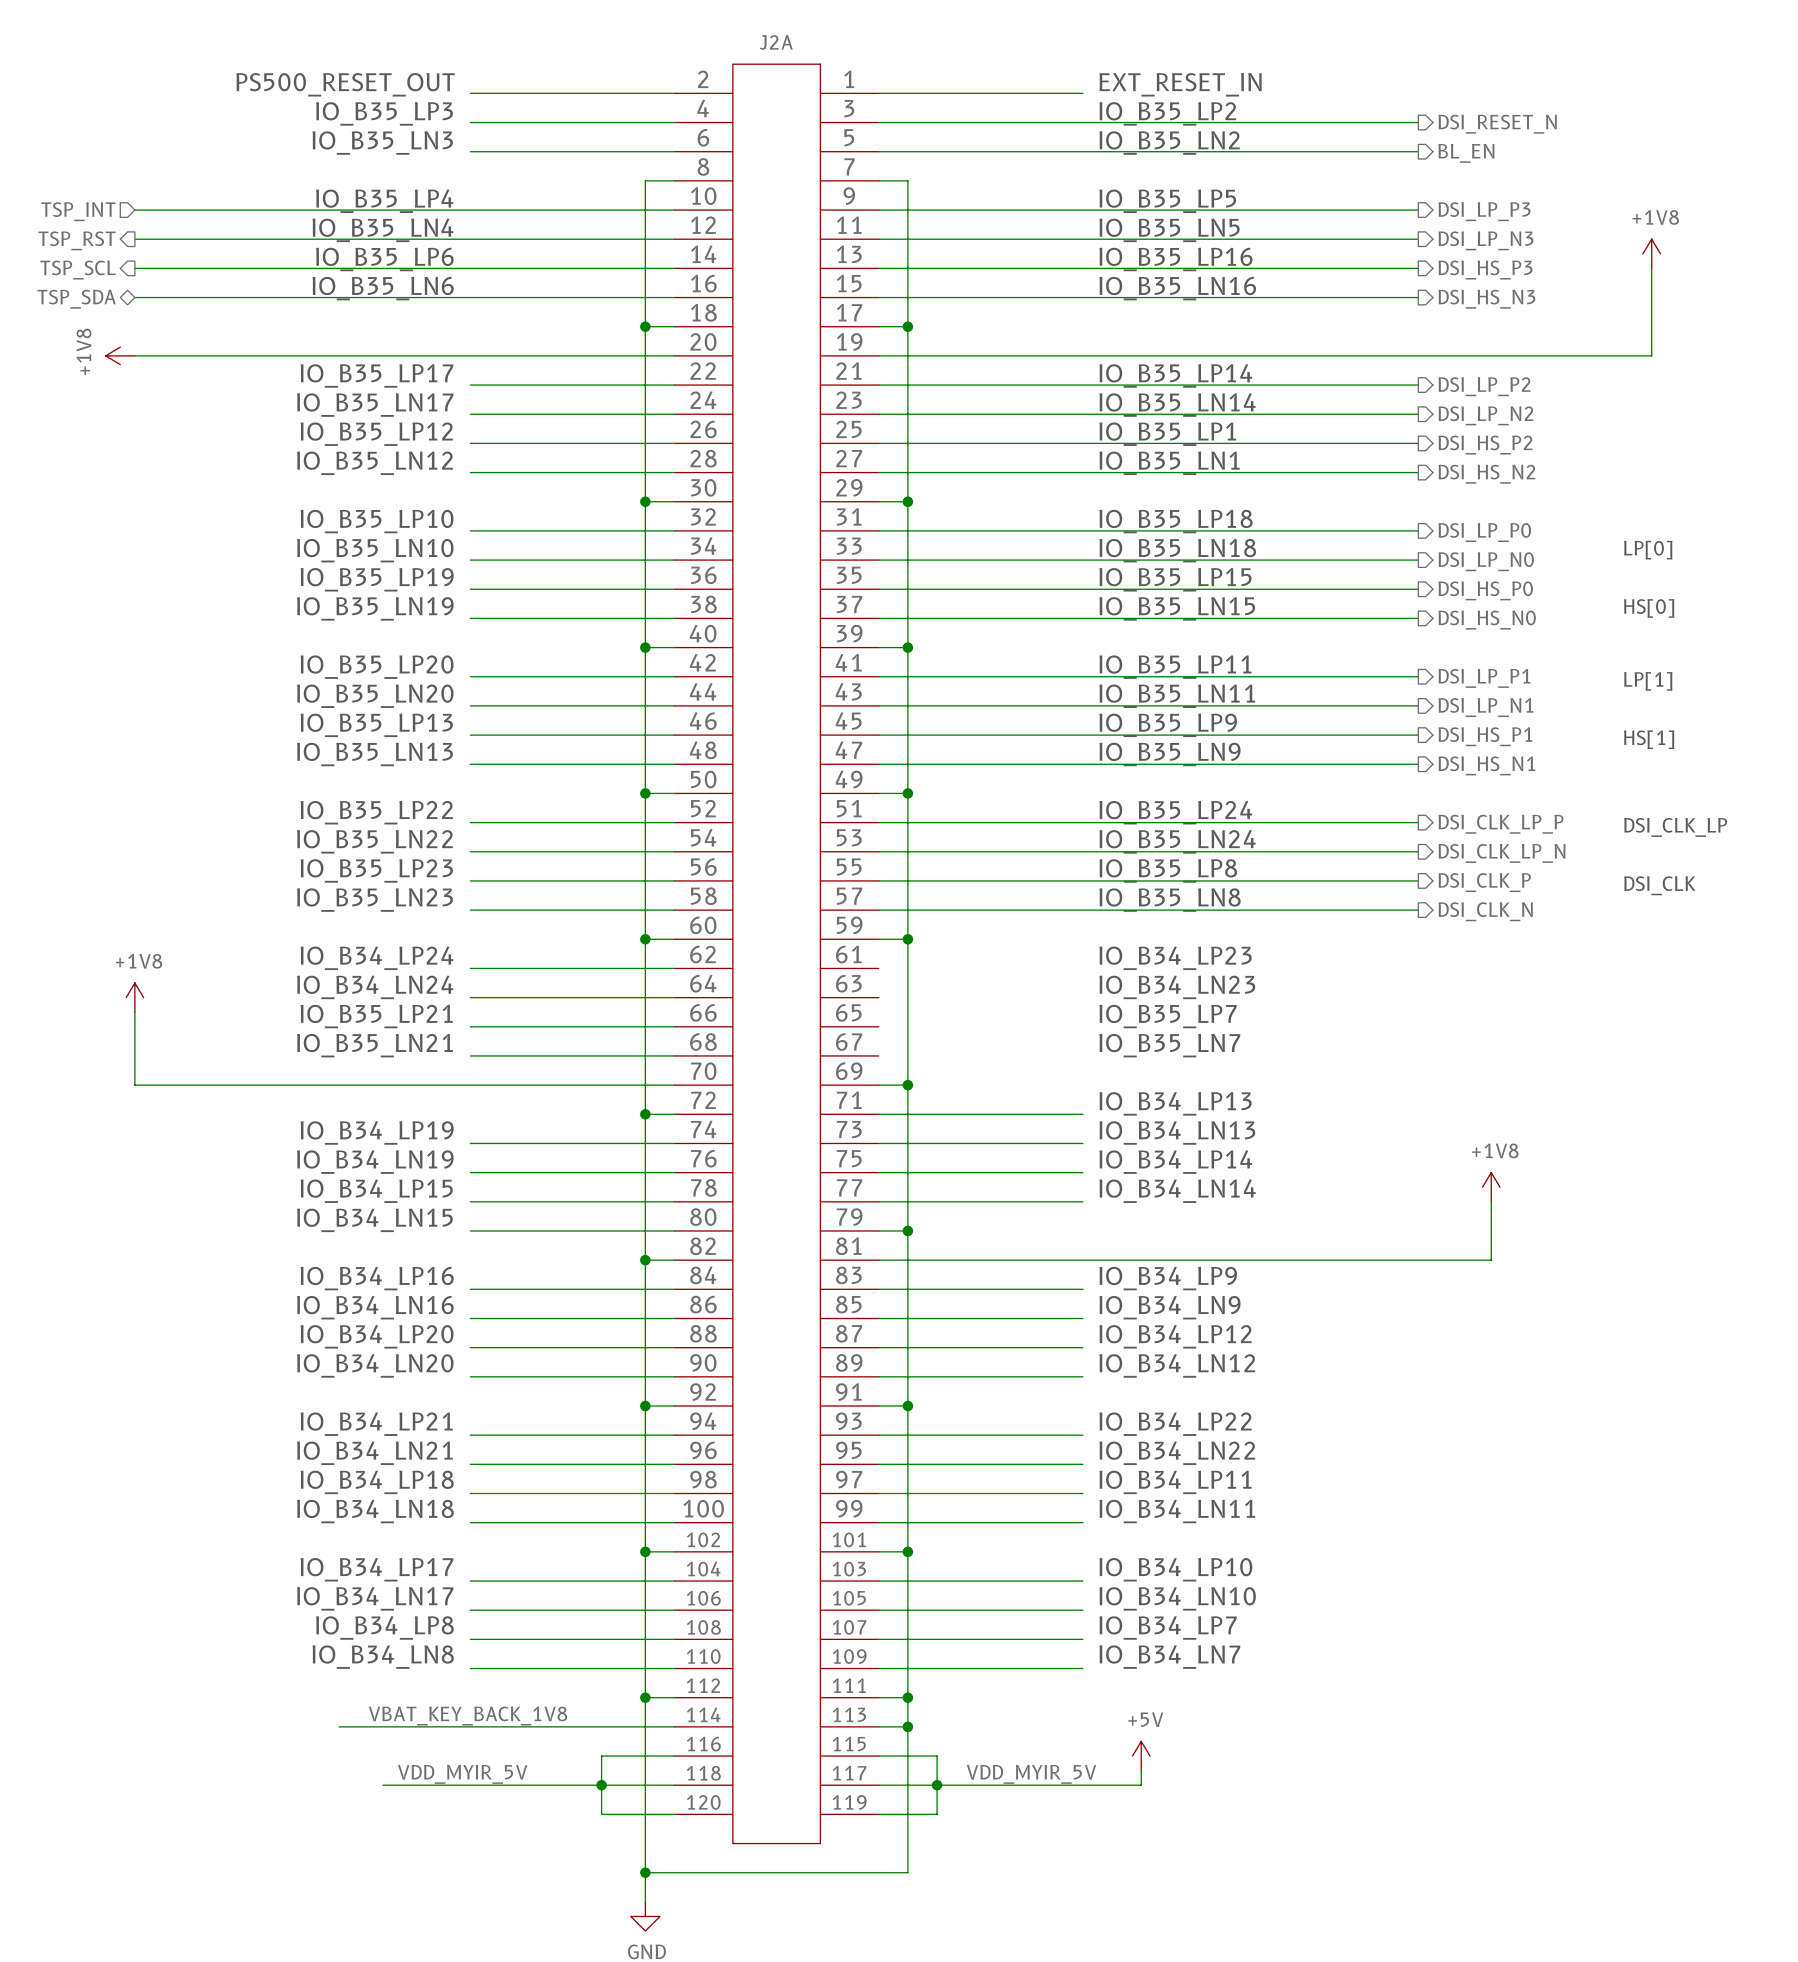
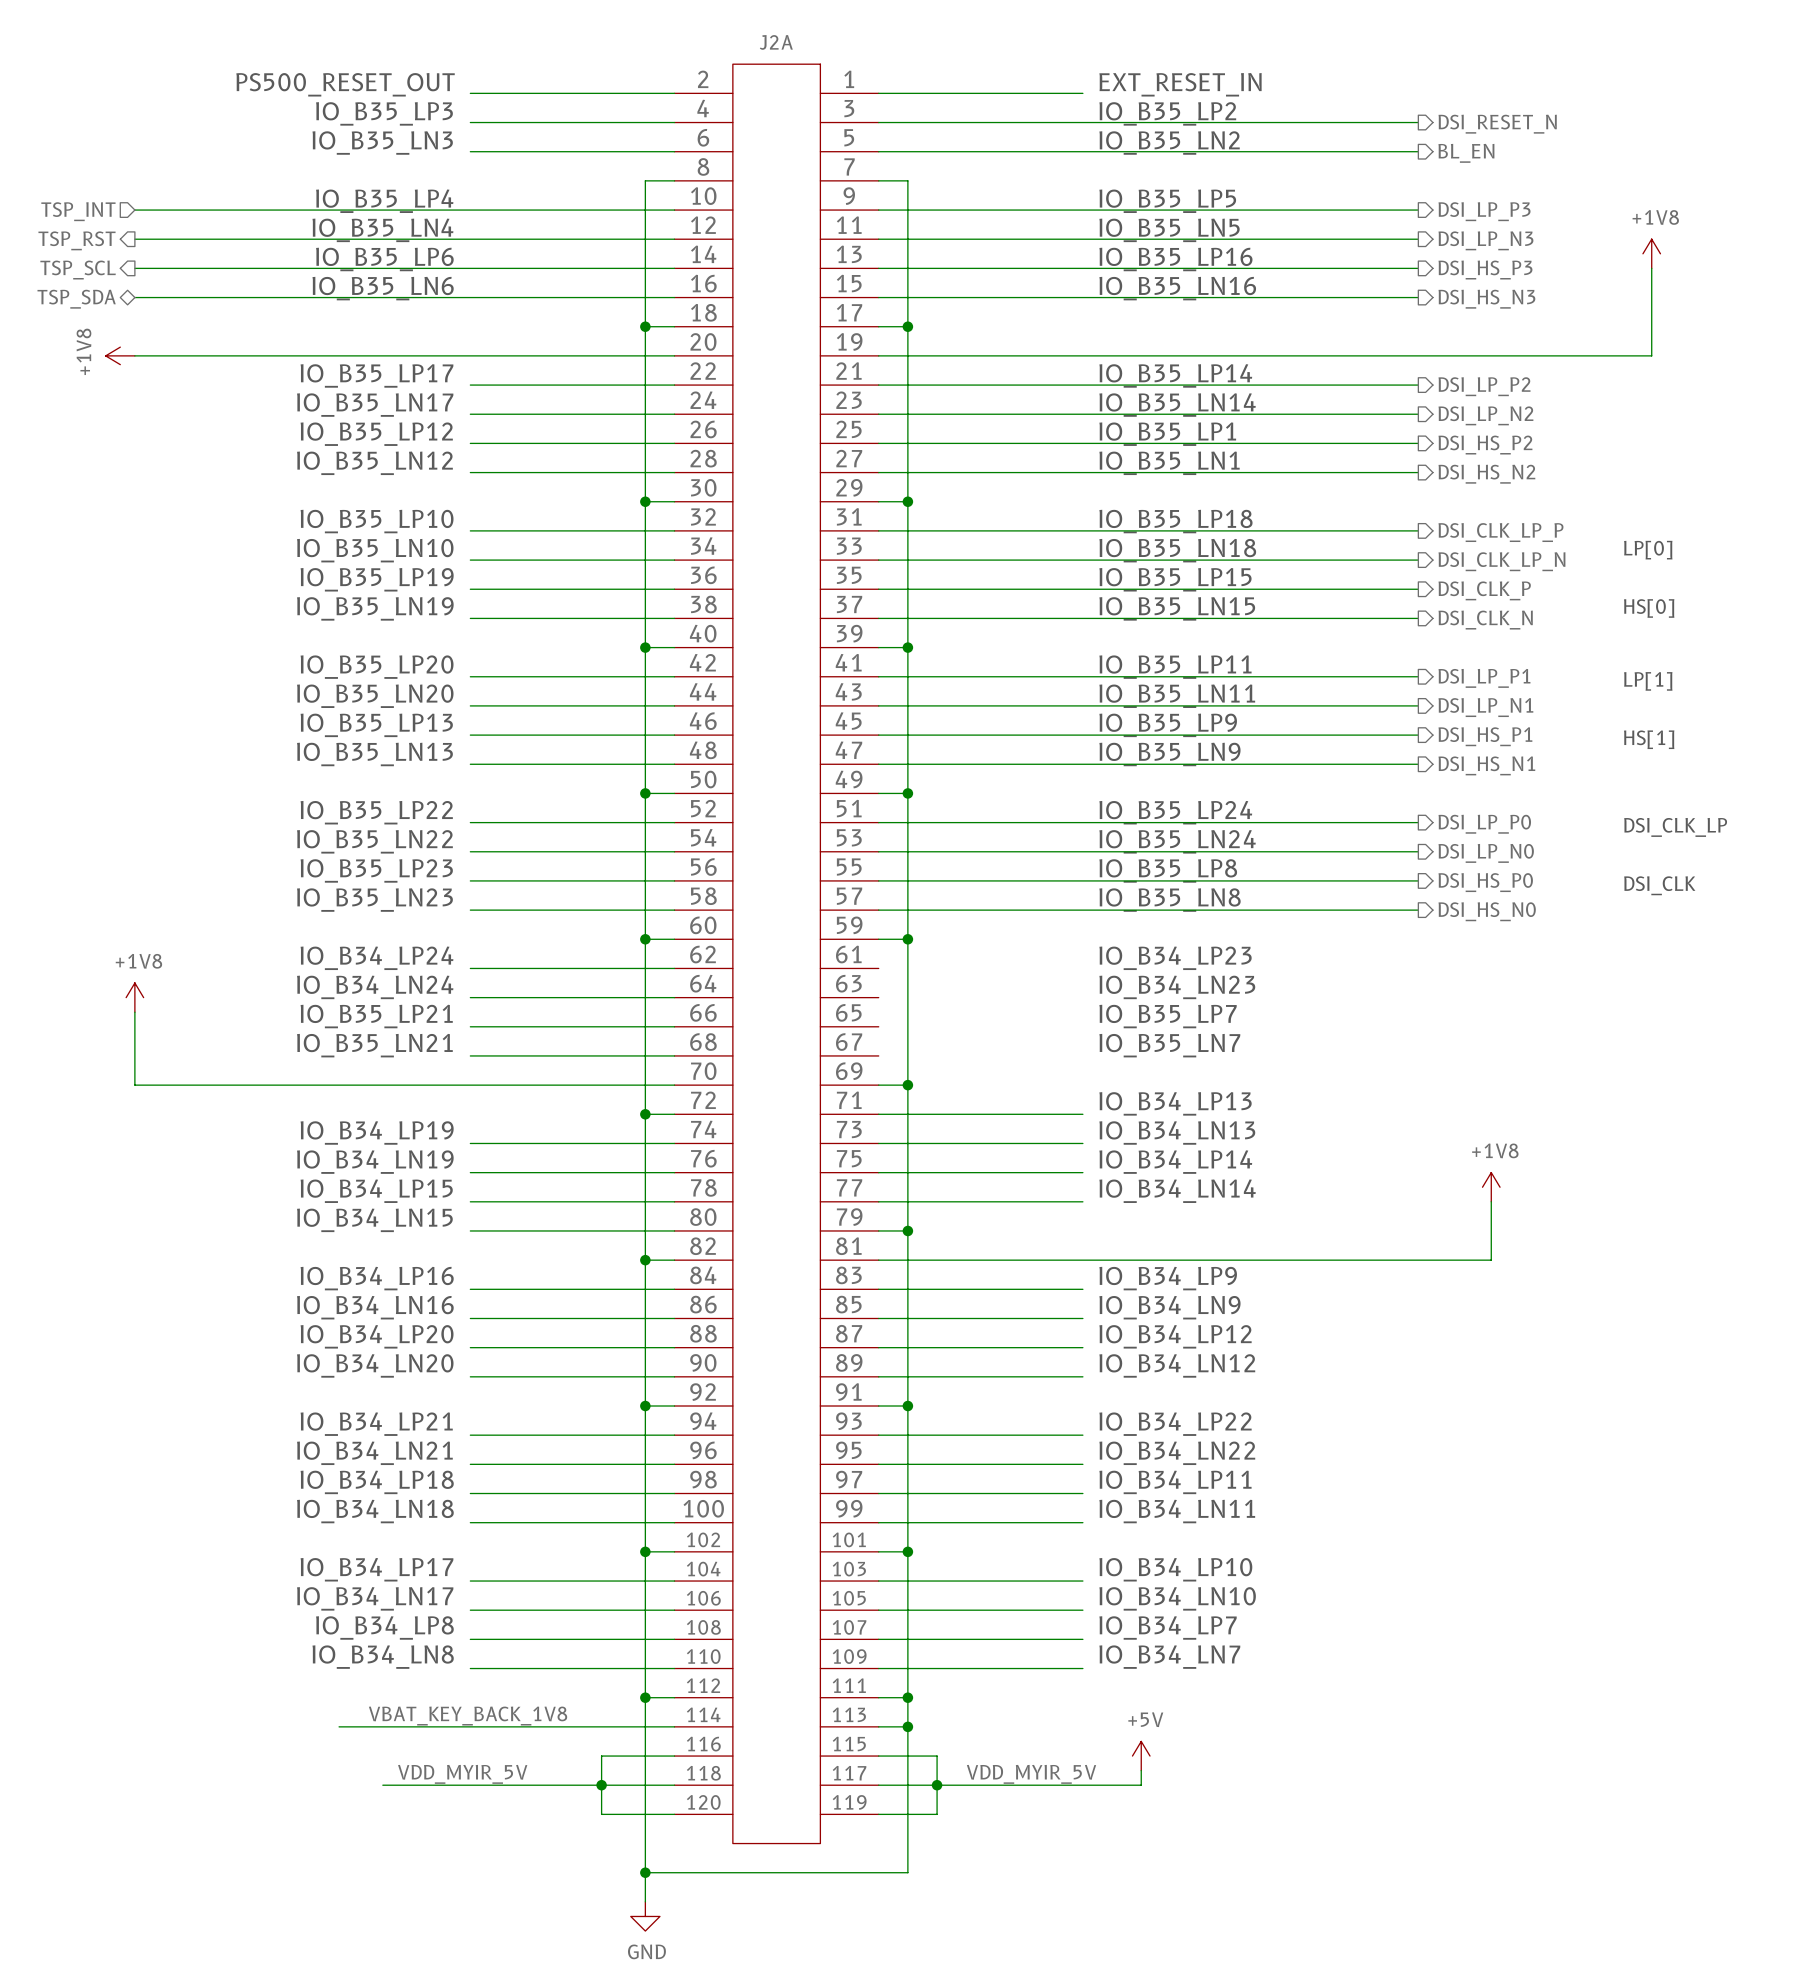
hierarchical label: DSI_LP_P0 (1484, 532) -> DSI_CLK_LP_P (1500, 532)
hierarchical label: DSI_LP_N0 (1486, 561) -> DSI_CLK_LP_N (1501, 561)
hierarchical label: DSI_HS_P0 (1485, 590) -> DSI_CLK_P (1484, 590)
hierarchical label: DSI_HS_N0 (1487, 620) -> DSI_CLK_N (1485, 620)
hierarchical label: DSI_CLK_LP_P (1500, 824) -> DSI_LP_P0 (1484, 824)
hierarchical label: DSI_CLK_LP_N (1501, 853) -> DSI_LP_N0 (1486, 853)
hierarchical label: DSI_CLK_P (1484, 882) -> DSI_HS_P0 (1485, 882)
hierarchical label: DSI_CLK_N (1485, 911) -> DSI_HS_N0 (1487, 911)

